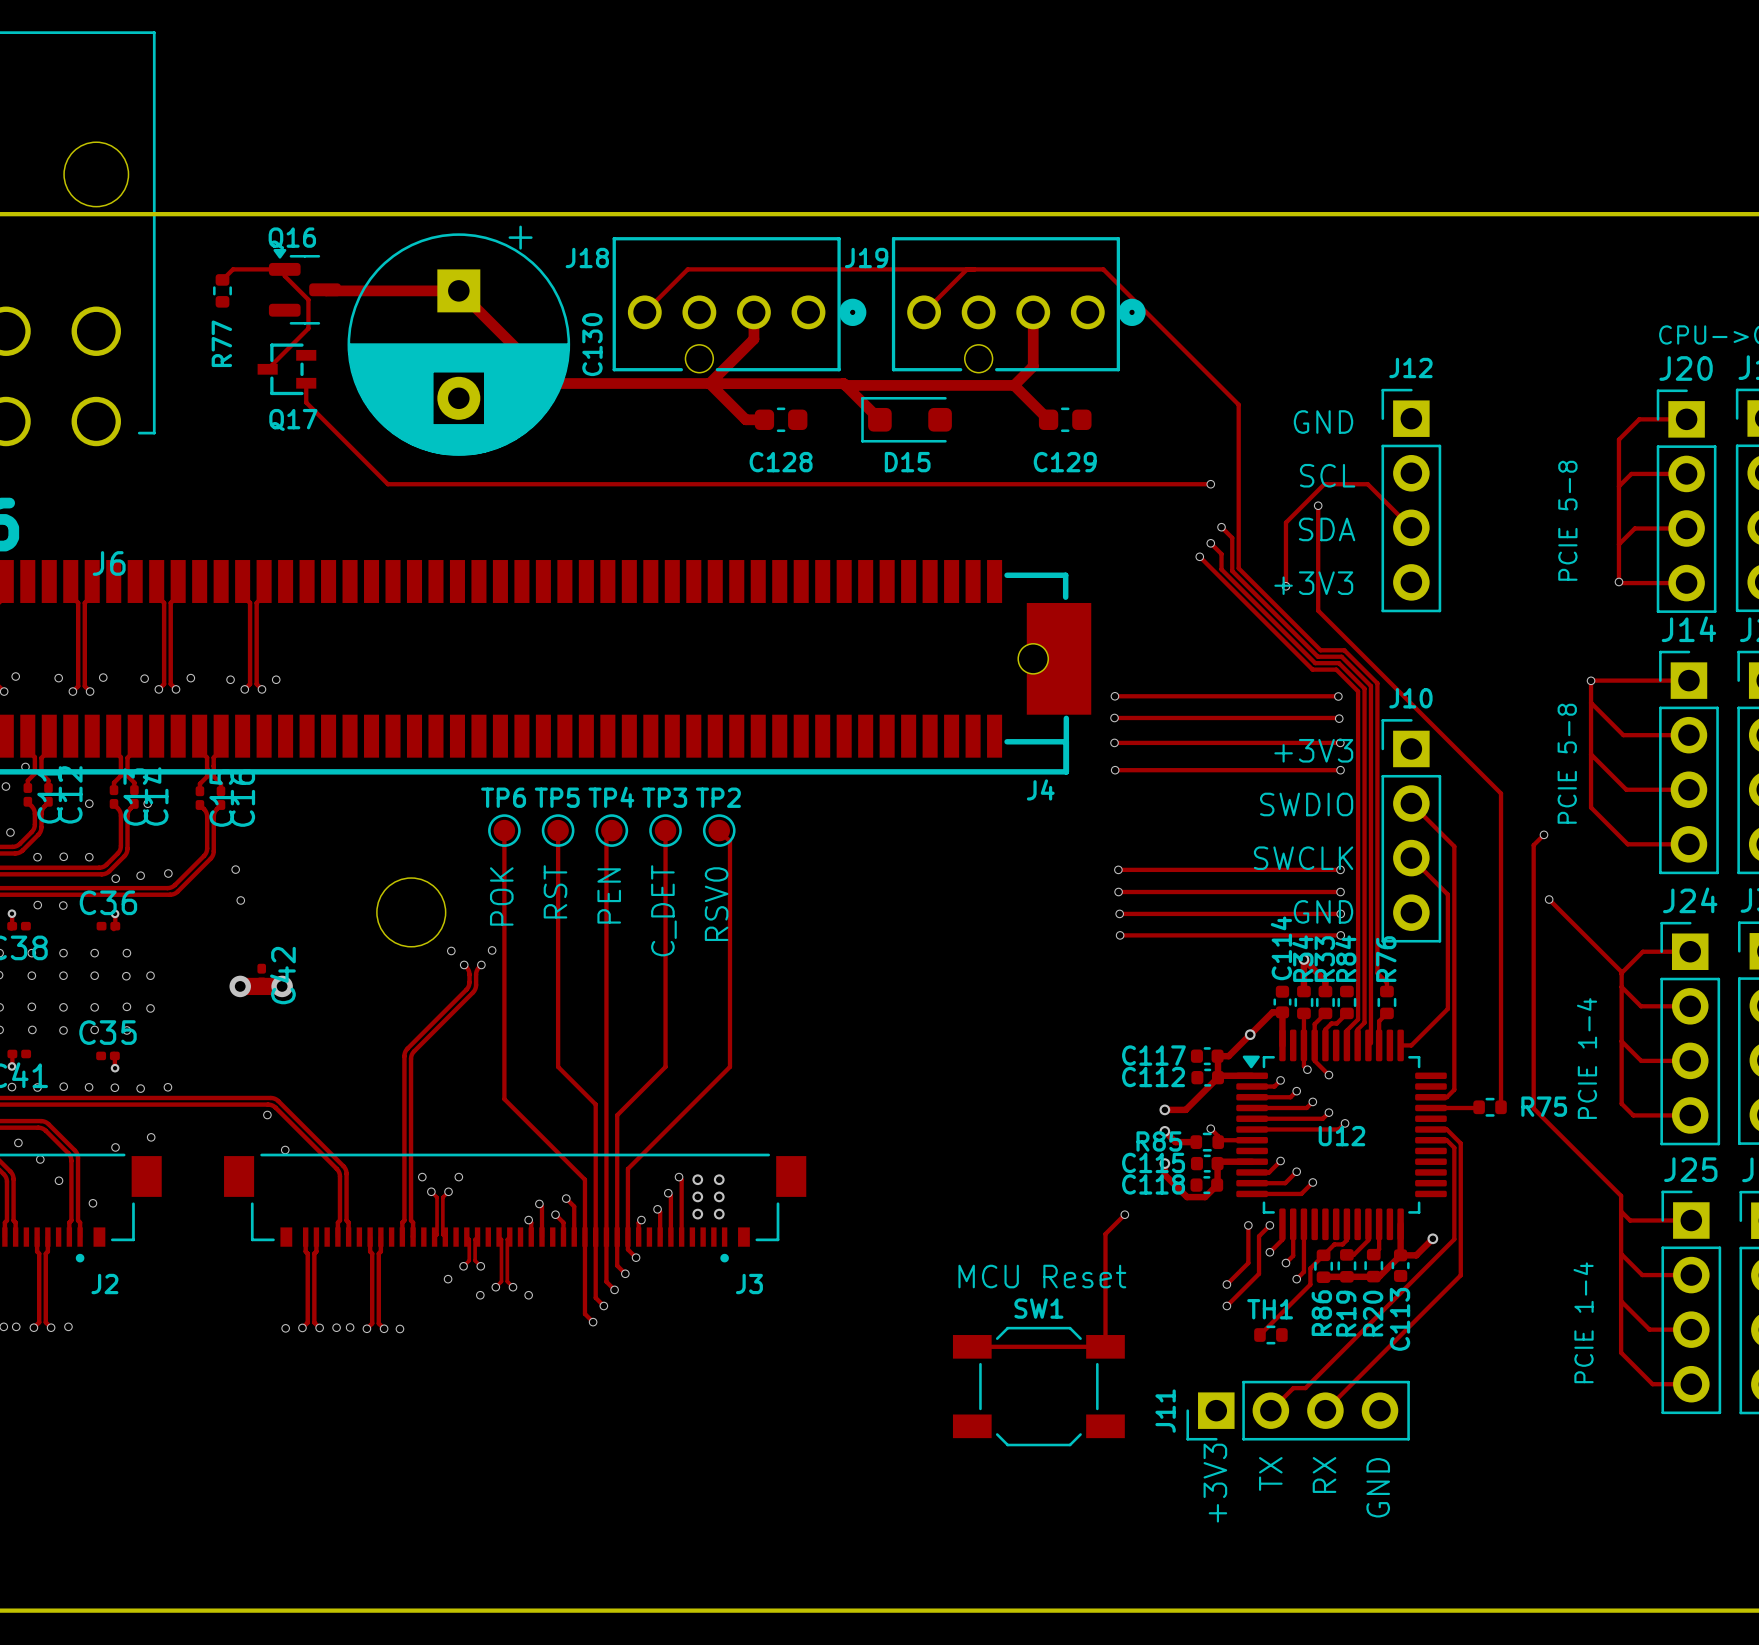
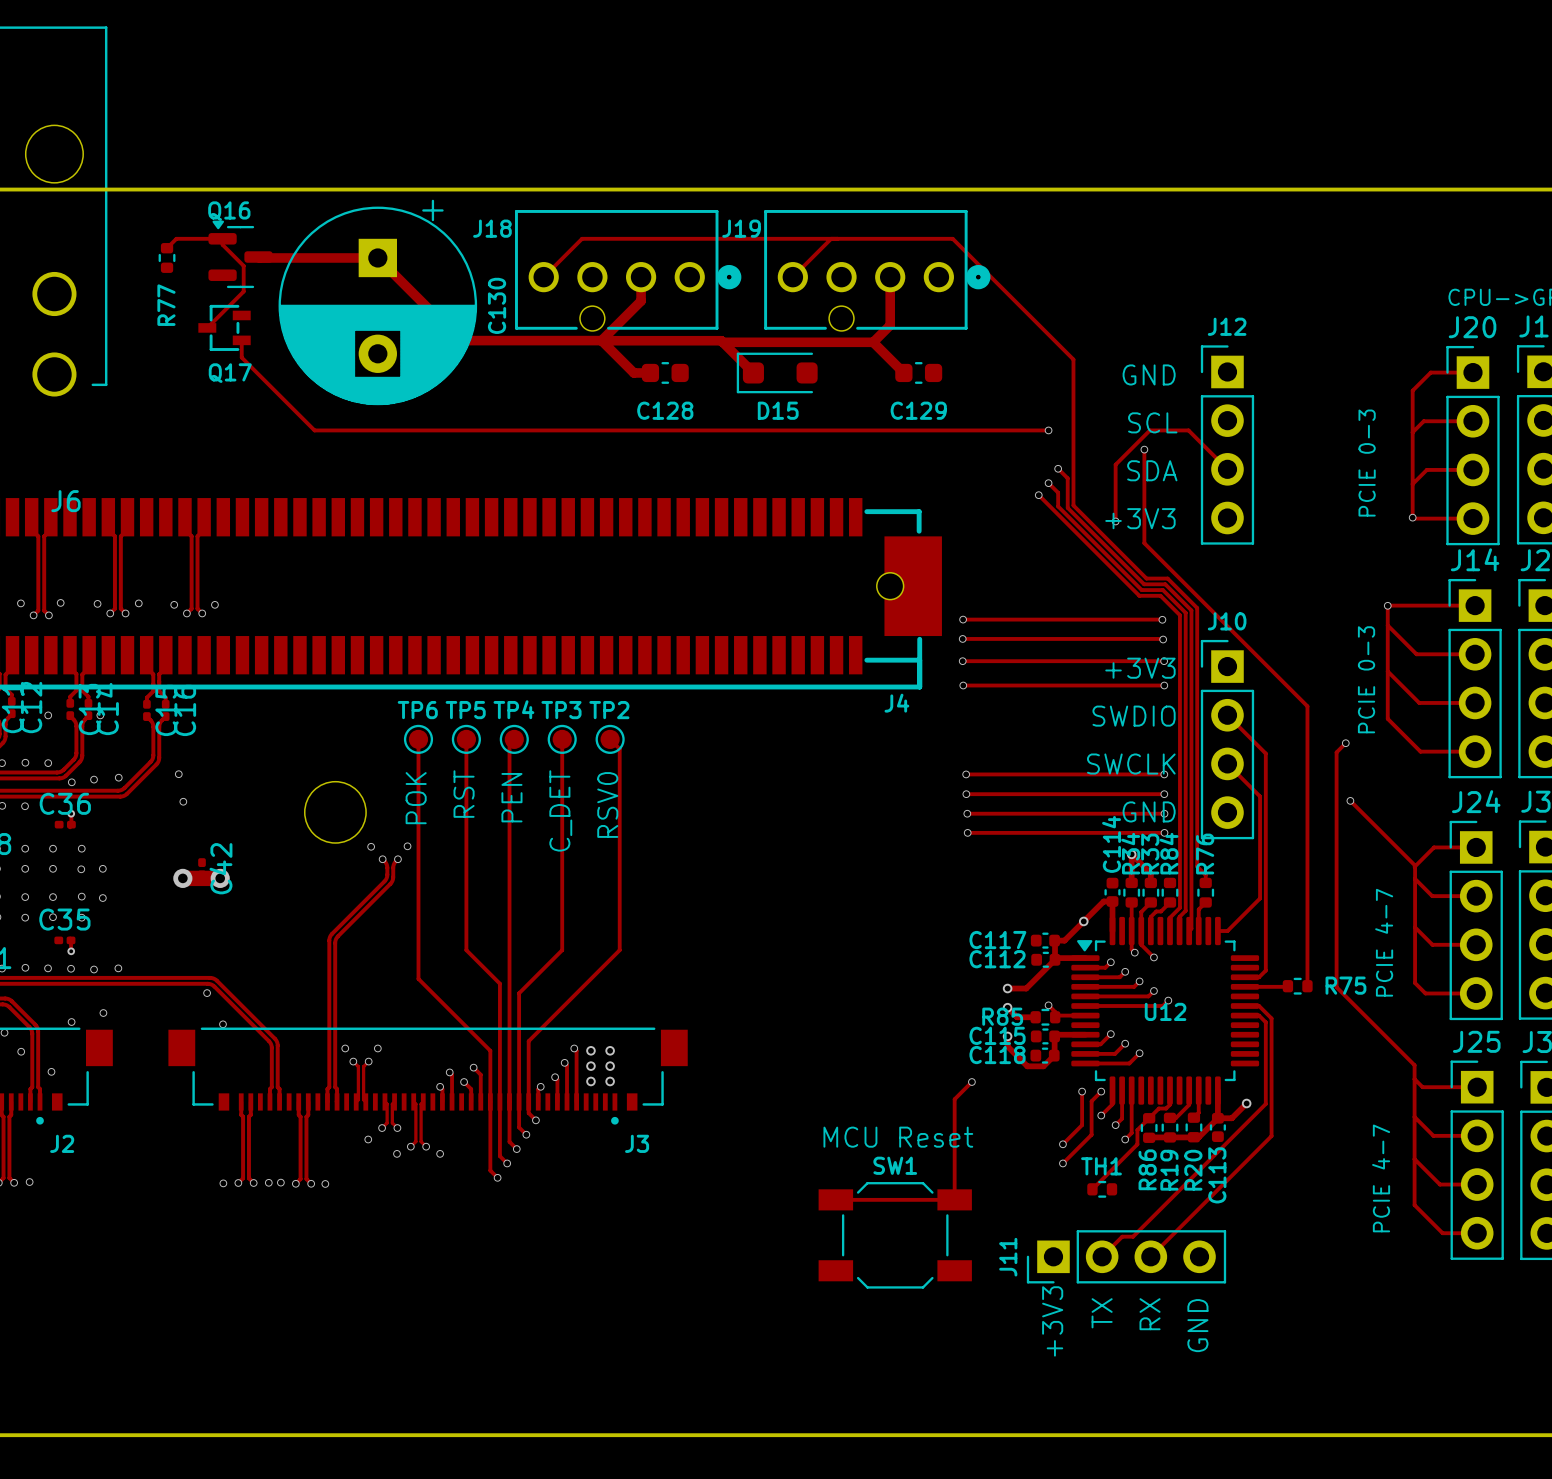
text: PCIE 5-8 (1567, 520) -> PCIE 0-3 (1367, 463)
text: PCIE 5-8 (1567, 763) -> PCIE 0-3 (1366, 679)
text: PCIE 1-4 (1587, 1058) -> PCIE 4-7 (1384, 942)
text: PCIE 1-4 (1583, 1322) -> PCIE 4-7 (1381, 1178)

